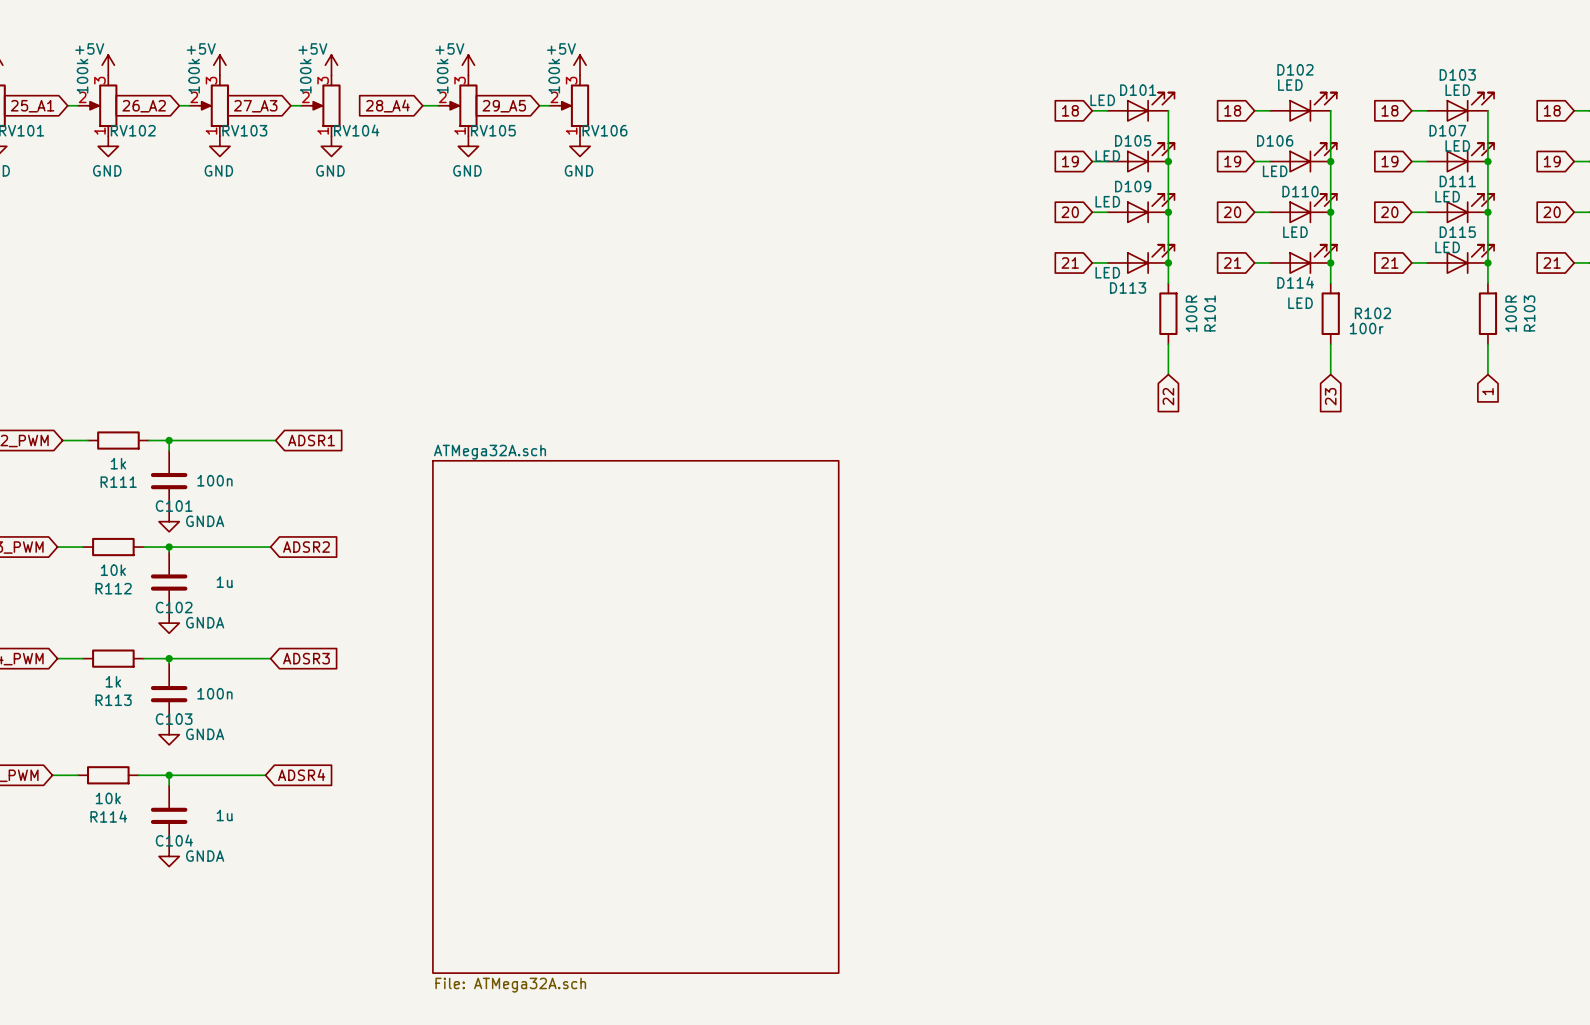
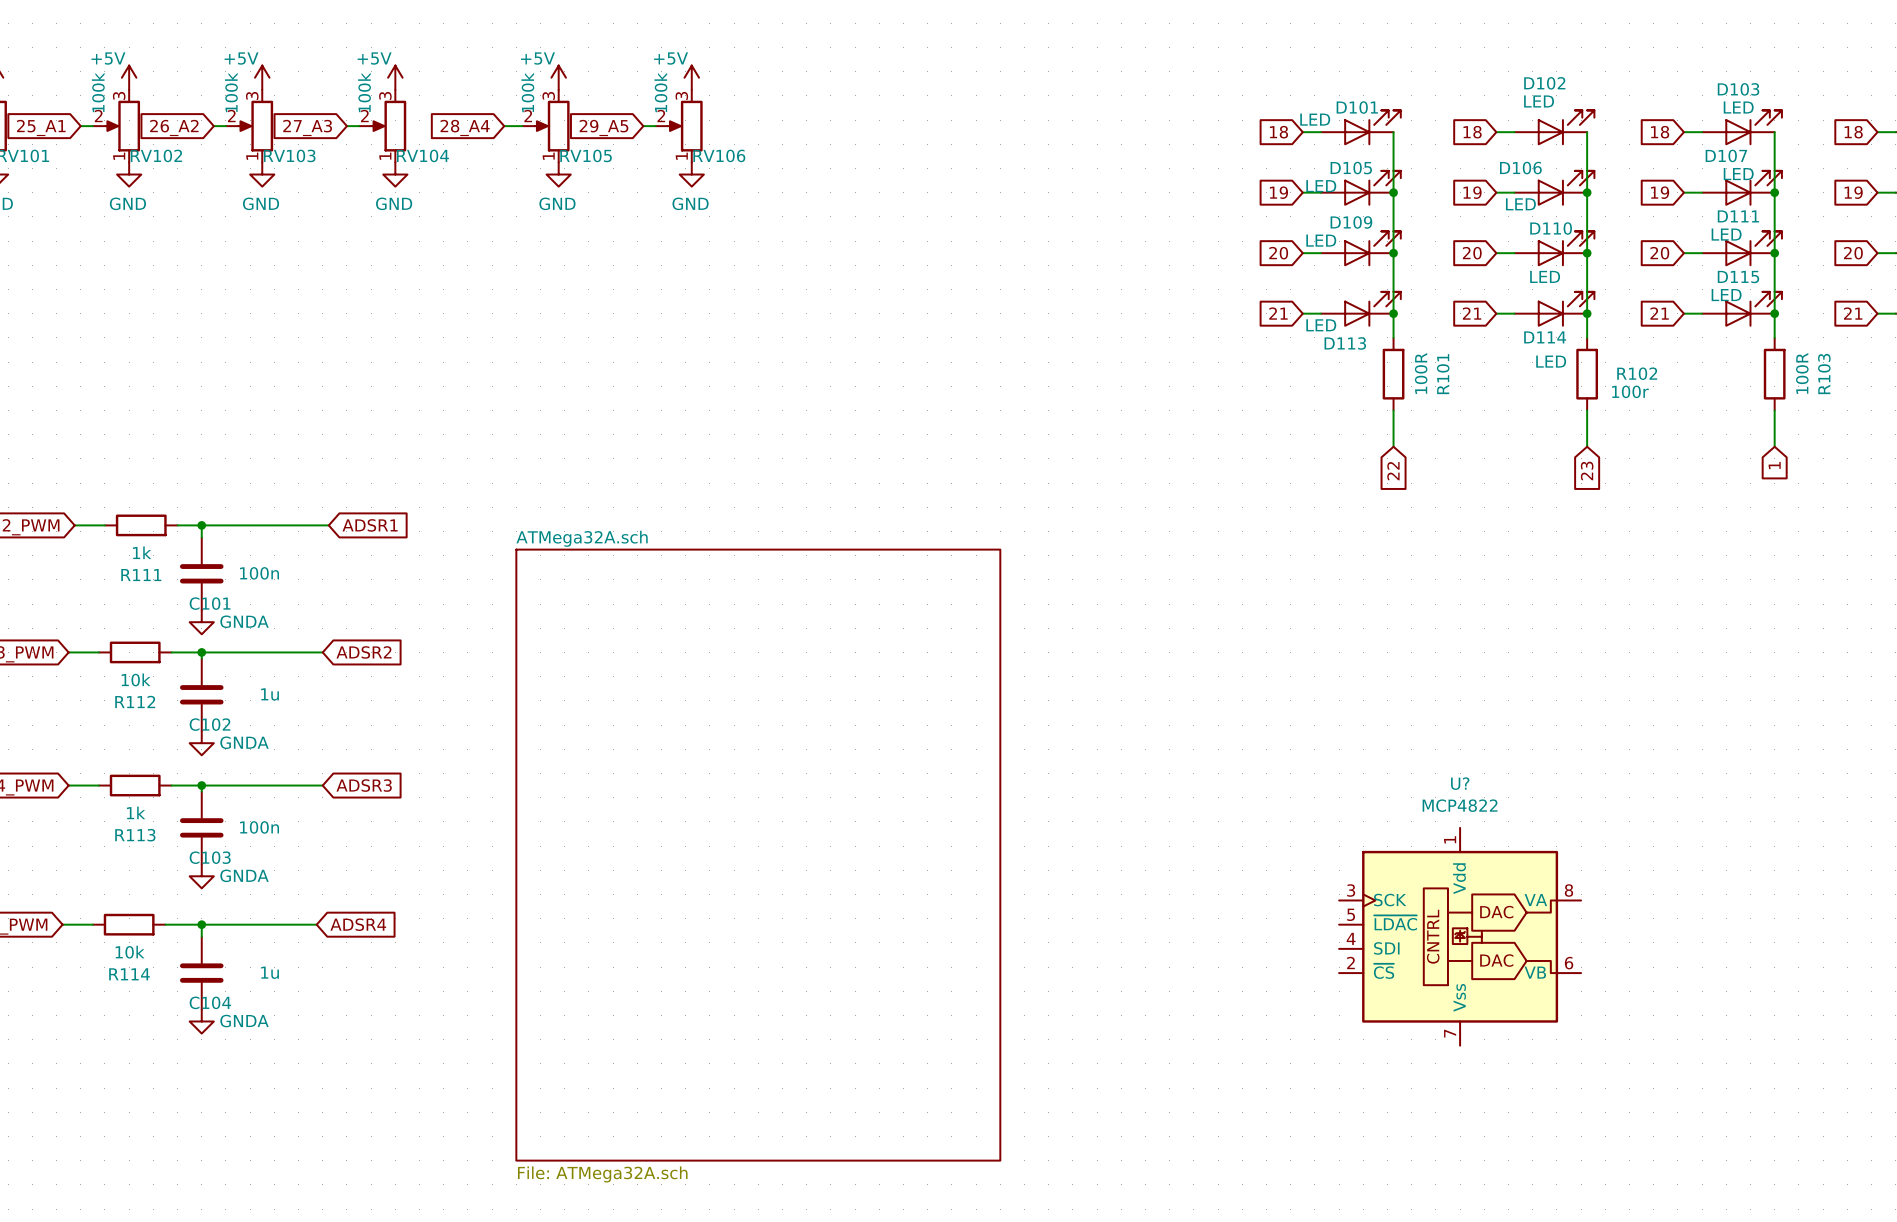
U?: none -> MCP4822 (1460, 936)

